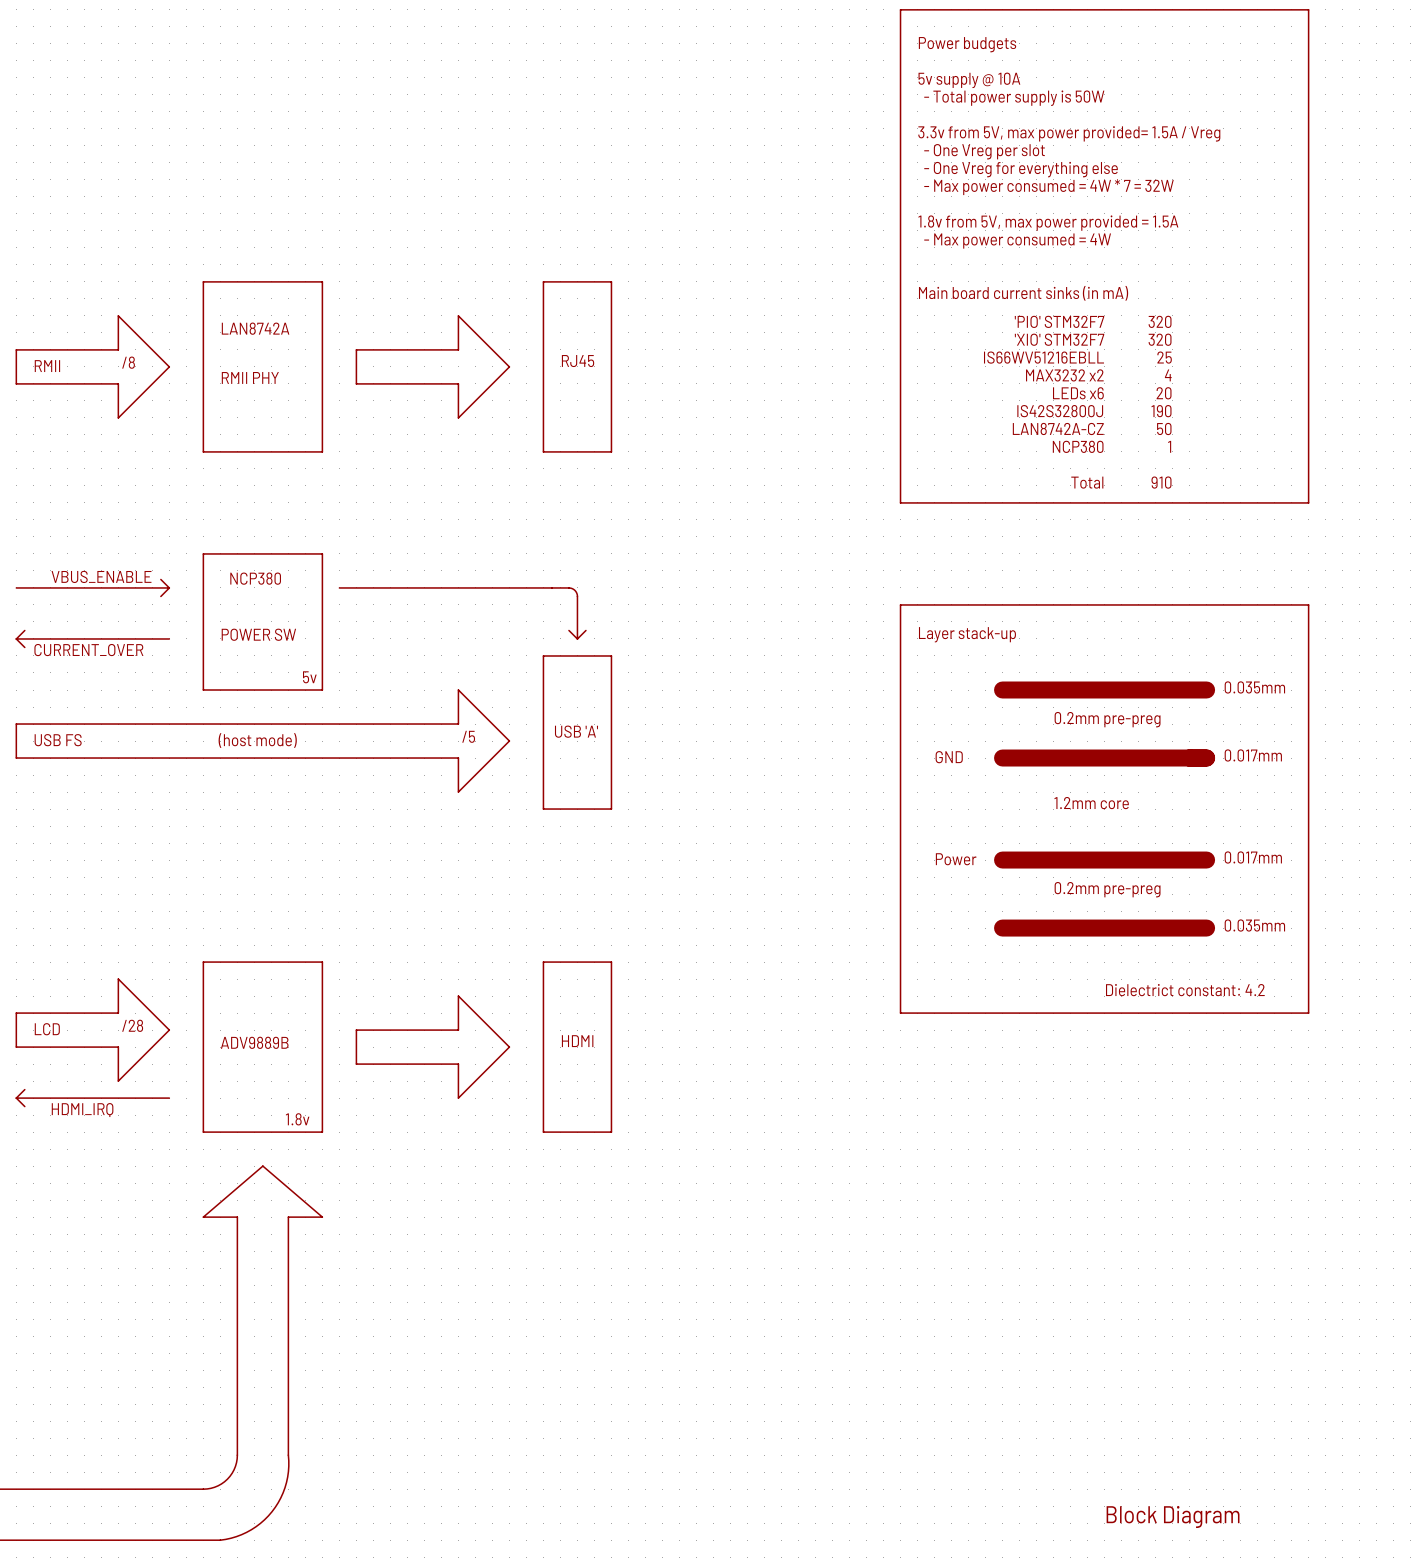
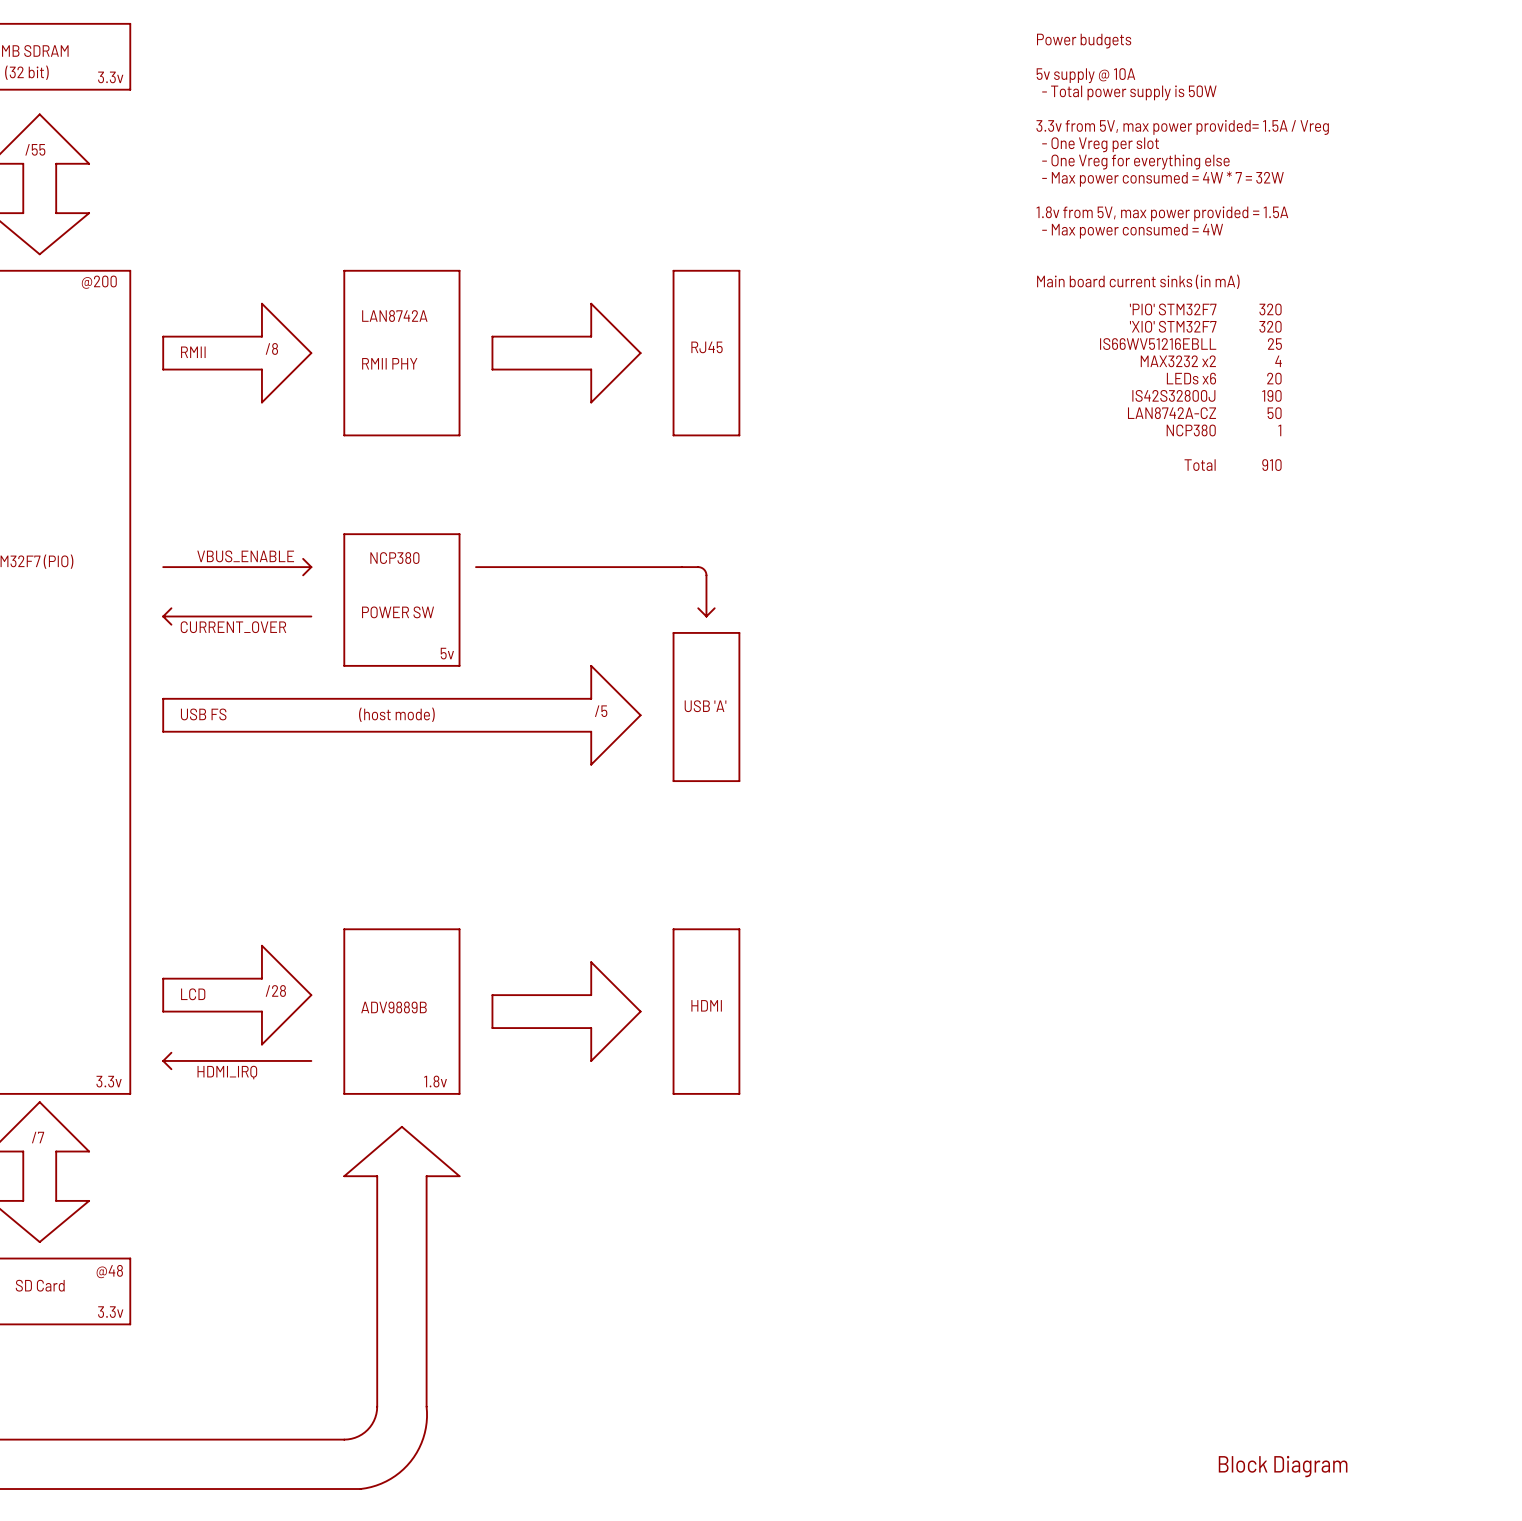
line: (900, 9) (1308, 9) (1308, 502) (900, 502) (900, 9) -> none
line: (900, 604) (1308, 604) (1308, 1013) (900, 1013) (900, 604) -> none
text: Layer stack-up (967, 634) -> none
text: 0.035mm (1254, 687) -> none
line: (1002, 690) (1206, 690) -> none
text: 0.2mm pre-preg (1107, 719) -> none
text: 0.017mm (1253, 755) -> none
text: GND (949, 757) -> none
line: (1002, 758) (1206, 758) -> none
text: 1.2mm core (1091, 803) -> none
text: 0.017mm (1253, 857) -> none
text: Power (956, 859) -> none
line: (1002, 860) (1206, 860) -> none
text: 0.2mm pre-preg (1107, 889) -> none
text: 0.035mm (1254, 925) -> none
line: (1002, 928) (1206, 928) -> none
text: Dielectrict constant: 4.2 (1185, 990) -> none

